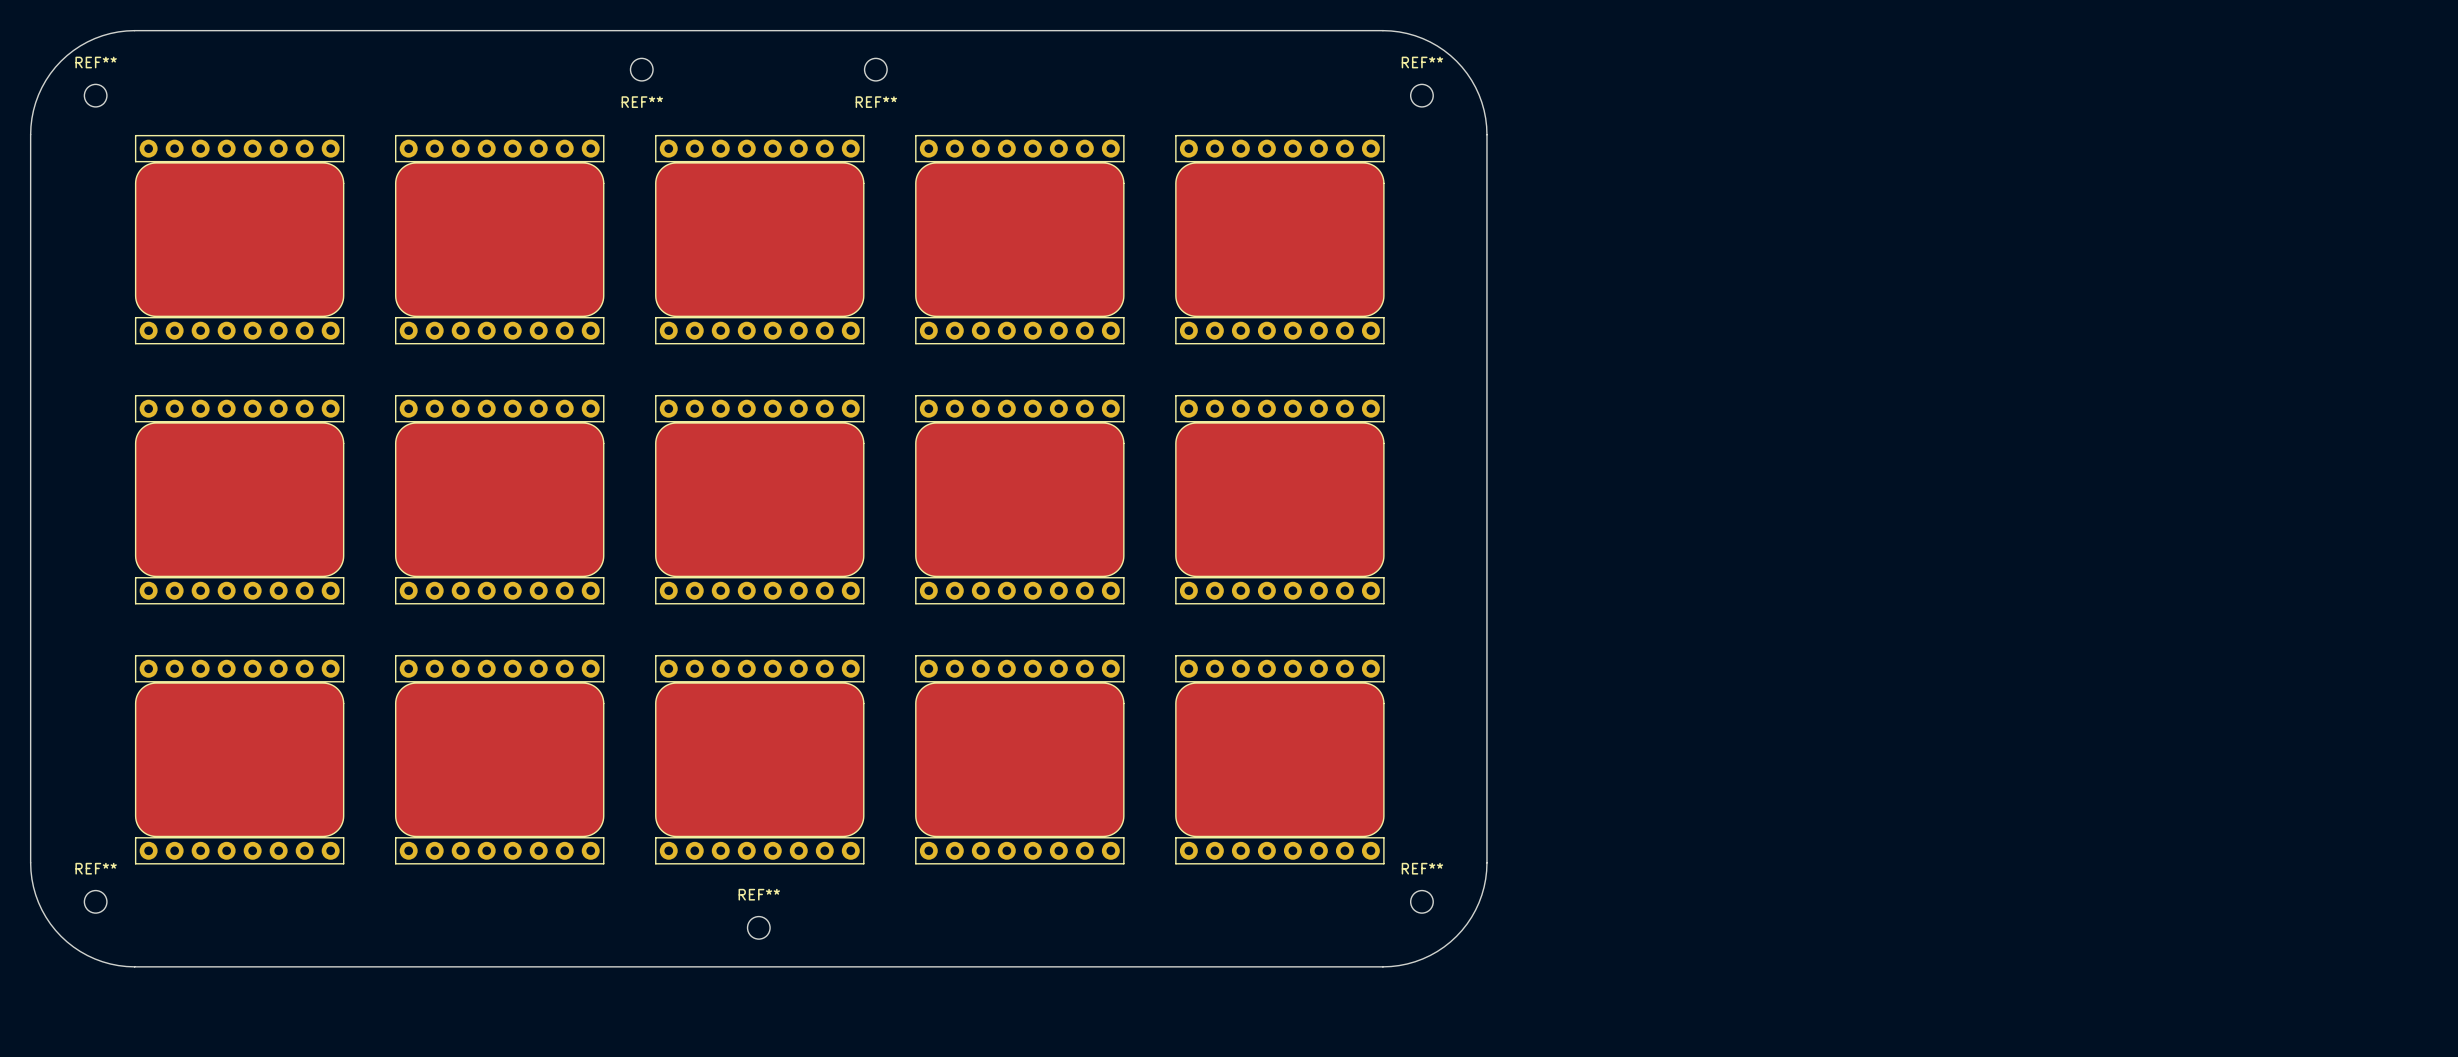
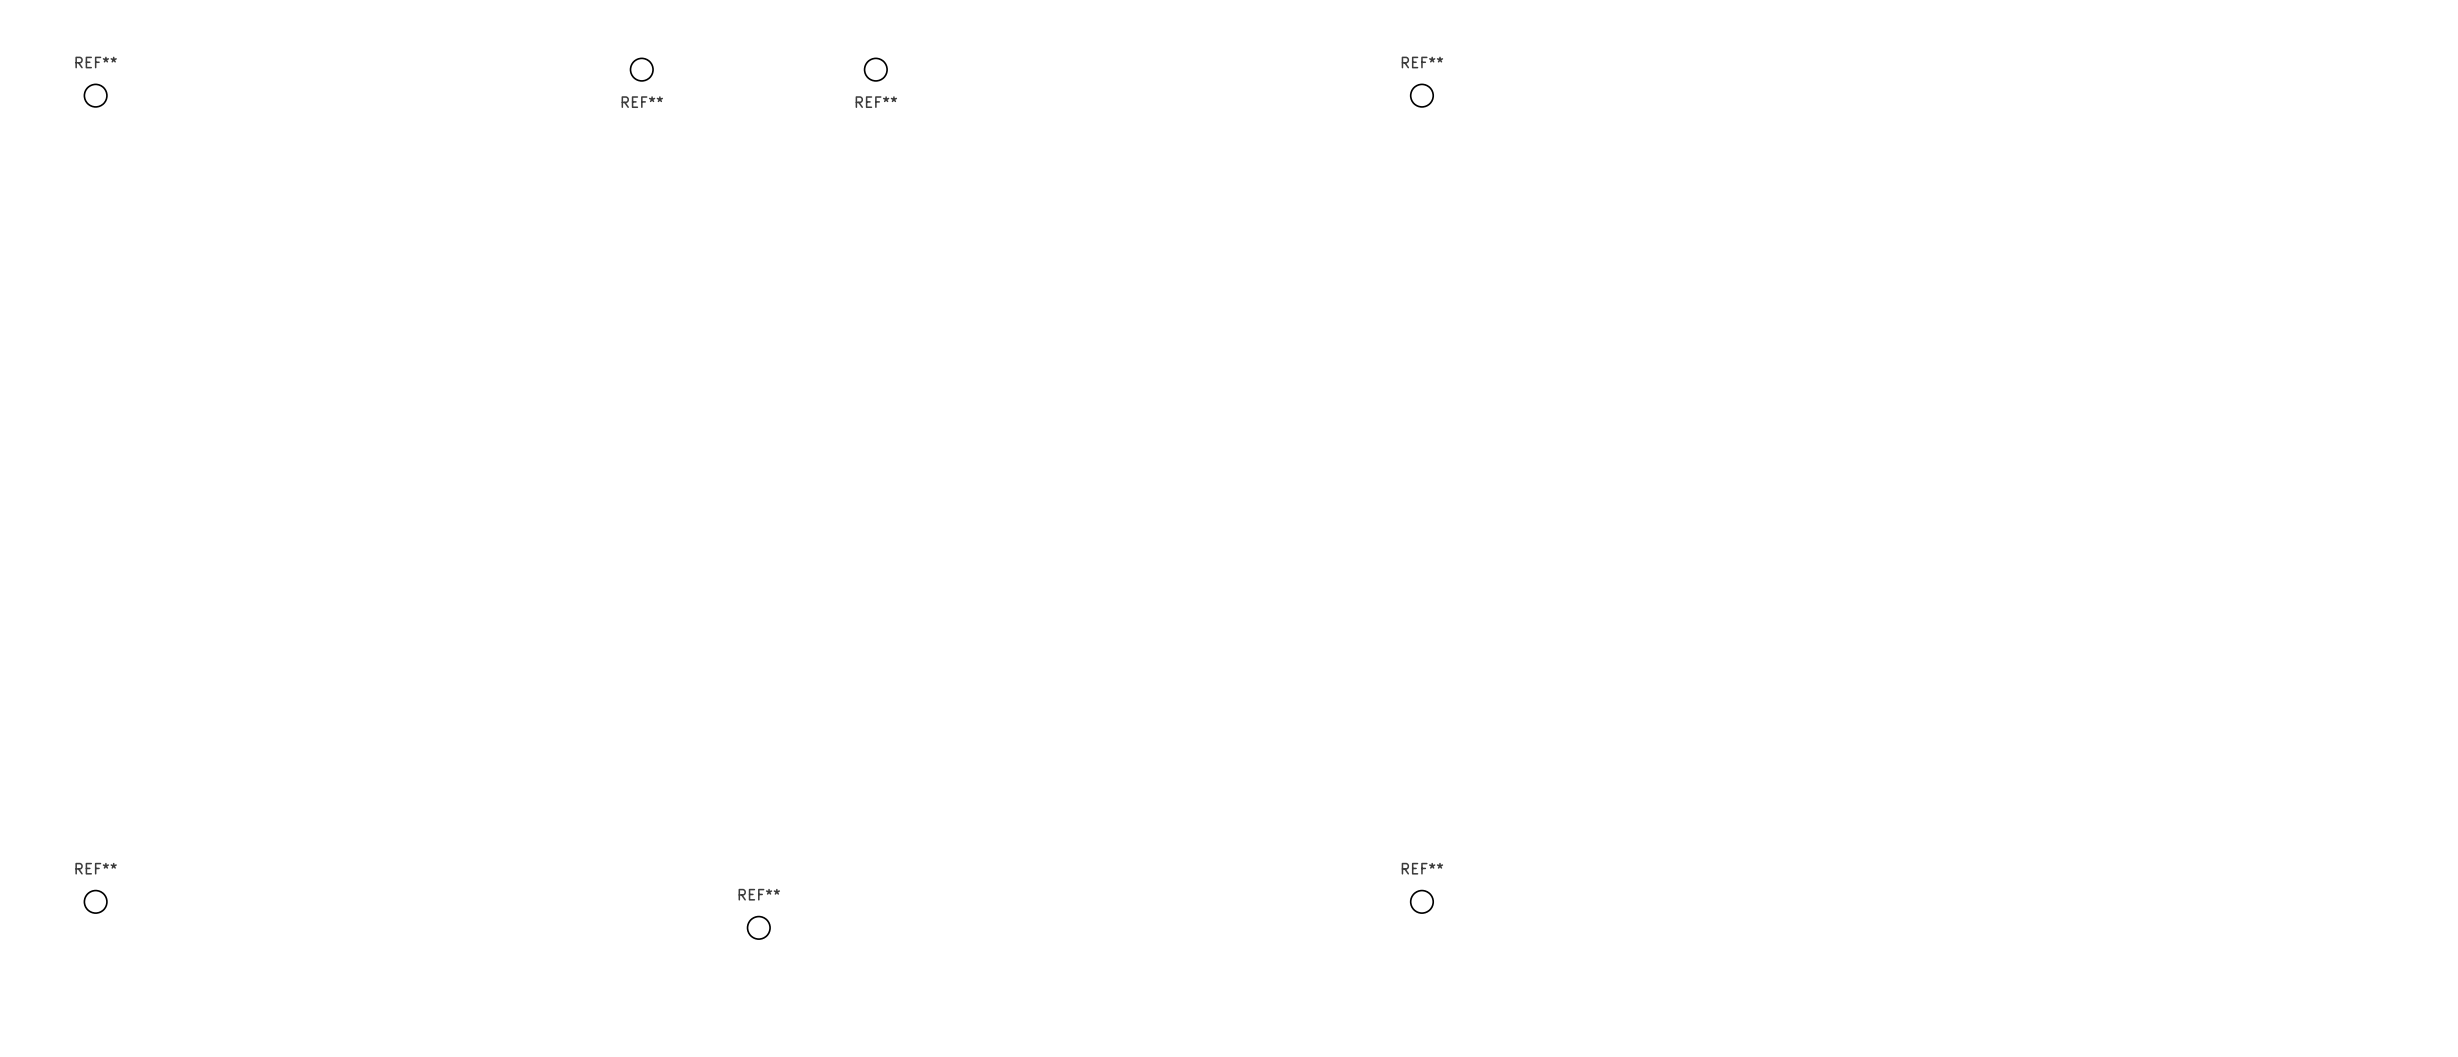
board edge: (134, 30) (1382, 30) (1407, 33) (1437, 45) (1456, 61) (1471, 80) (1481, 102) (1486, 126) (1486, 862) (1484, 887) (1471, 917) (1456, 936) (1437, 951) (1407, 963) (1382, 966) (134, 966) (110, 963) (80, 951) (61, 936) (45, 917) (35, 894) (30, 870) (30, 126) (38, 94) (50, 73) (61, 61) (73, 50) (94, 38) (110, 33) (134, 30) -> none
part: (239, 239) -> none
part: (499, 239) -> none
part: (759, 239) -> none
part: (1019, 239) -> none
part: (1279, 239) -> none
part: (239, 499) -> none
part: (499, 499) -> none
part: (759, 499) -> none
part: (1019, 499) -> none
part: (1279, 499) -> none
part: (239, 759) -> none
part: (499, 759) -> none
part: (759, 759) -> none
part: (1019, 759) -> none
part: (1279, 759) -> none

